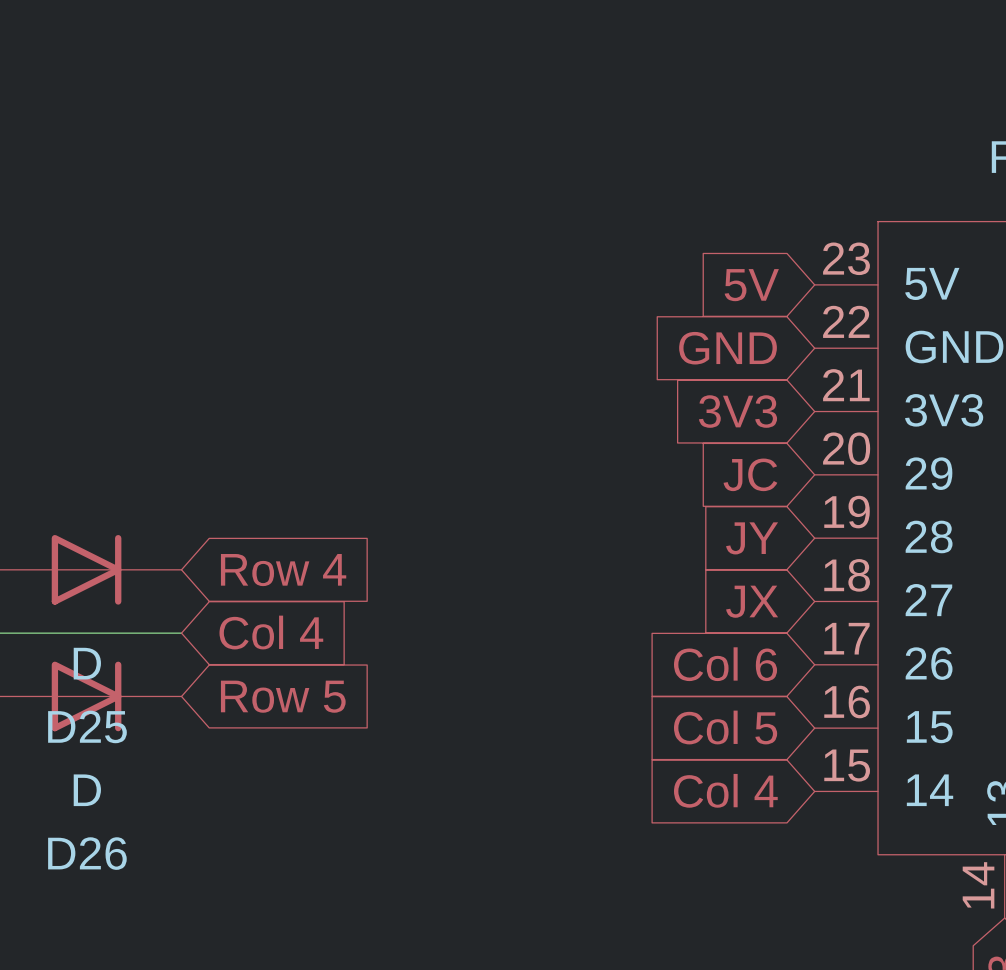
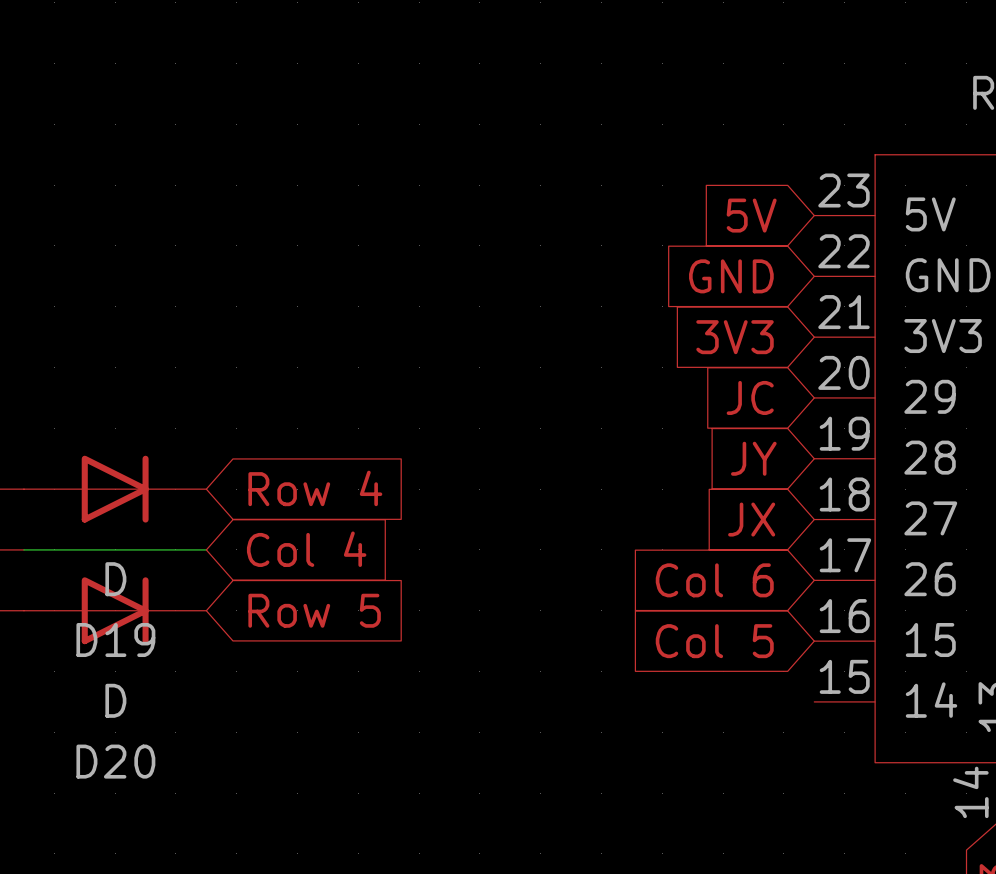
D25 name: D25 (87, 726) -> D19 (115, 640)
global label: Col 4 (725, 790) -> none
D26 name: D26 (87, 853) -> D20 (115, 761)

